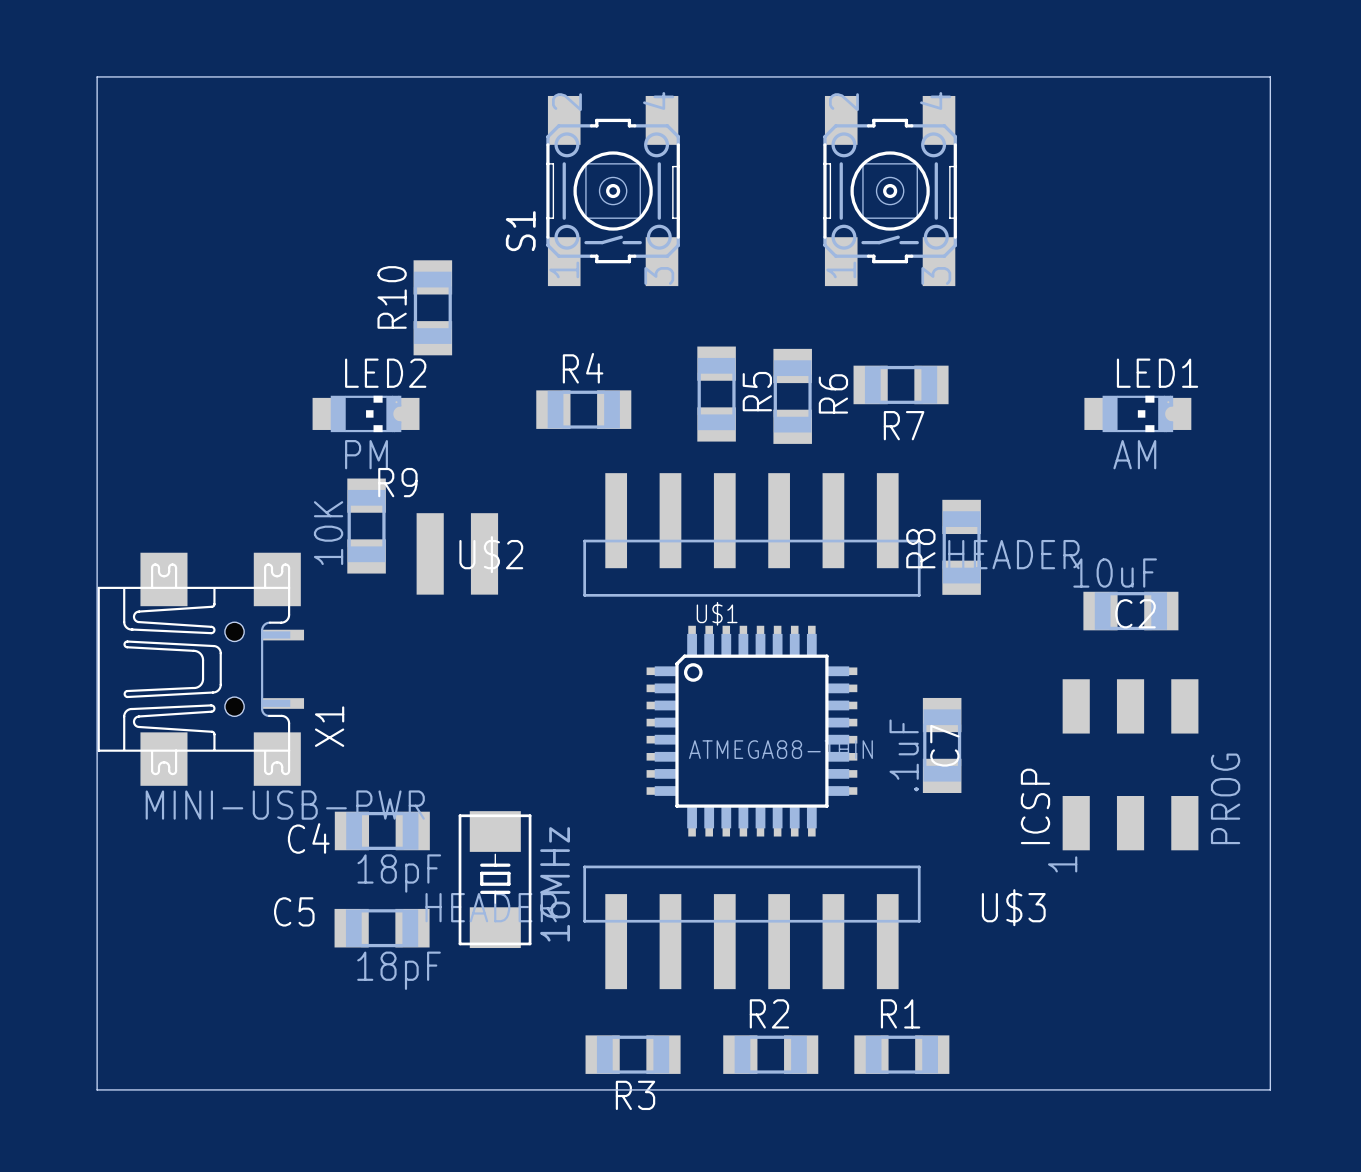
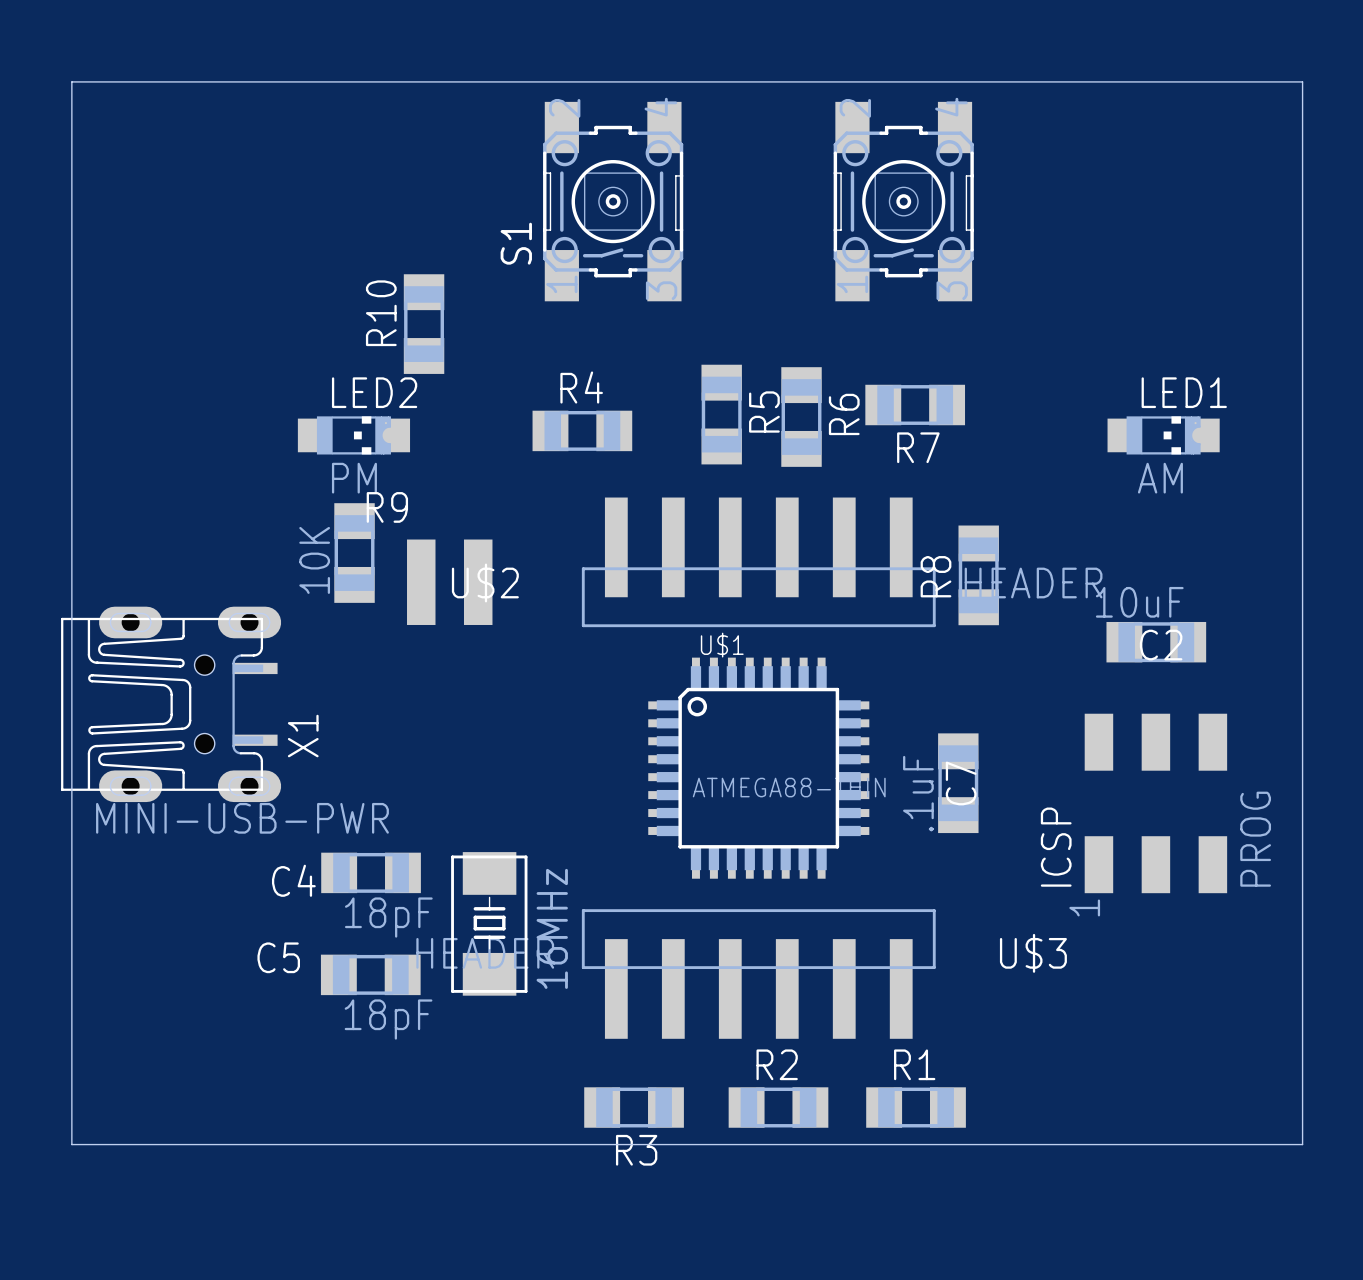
X1 footprint: [97, 552, 305, 786] -> [61, 606, 282, 803]

